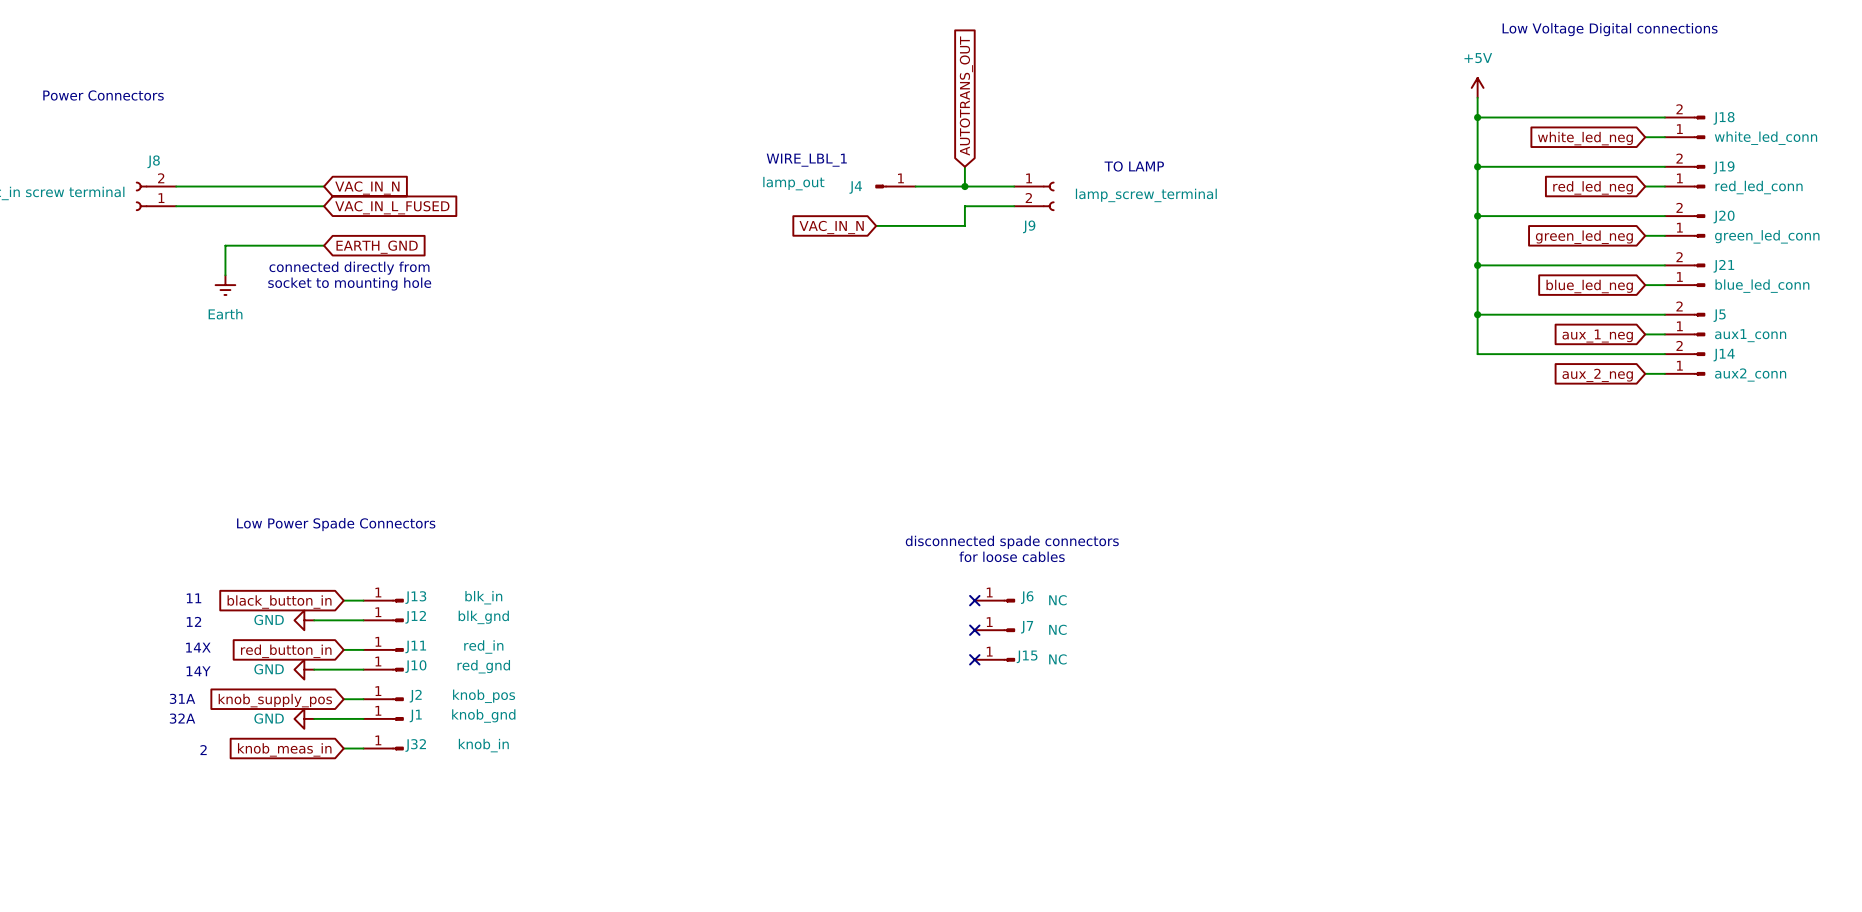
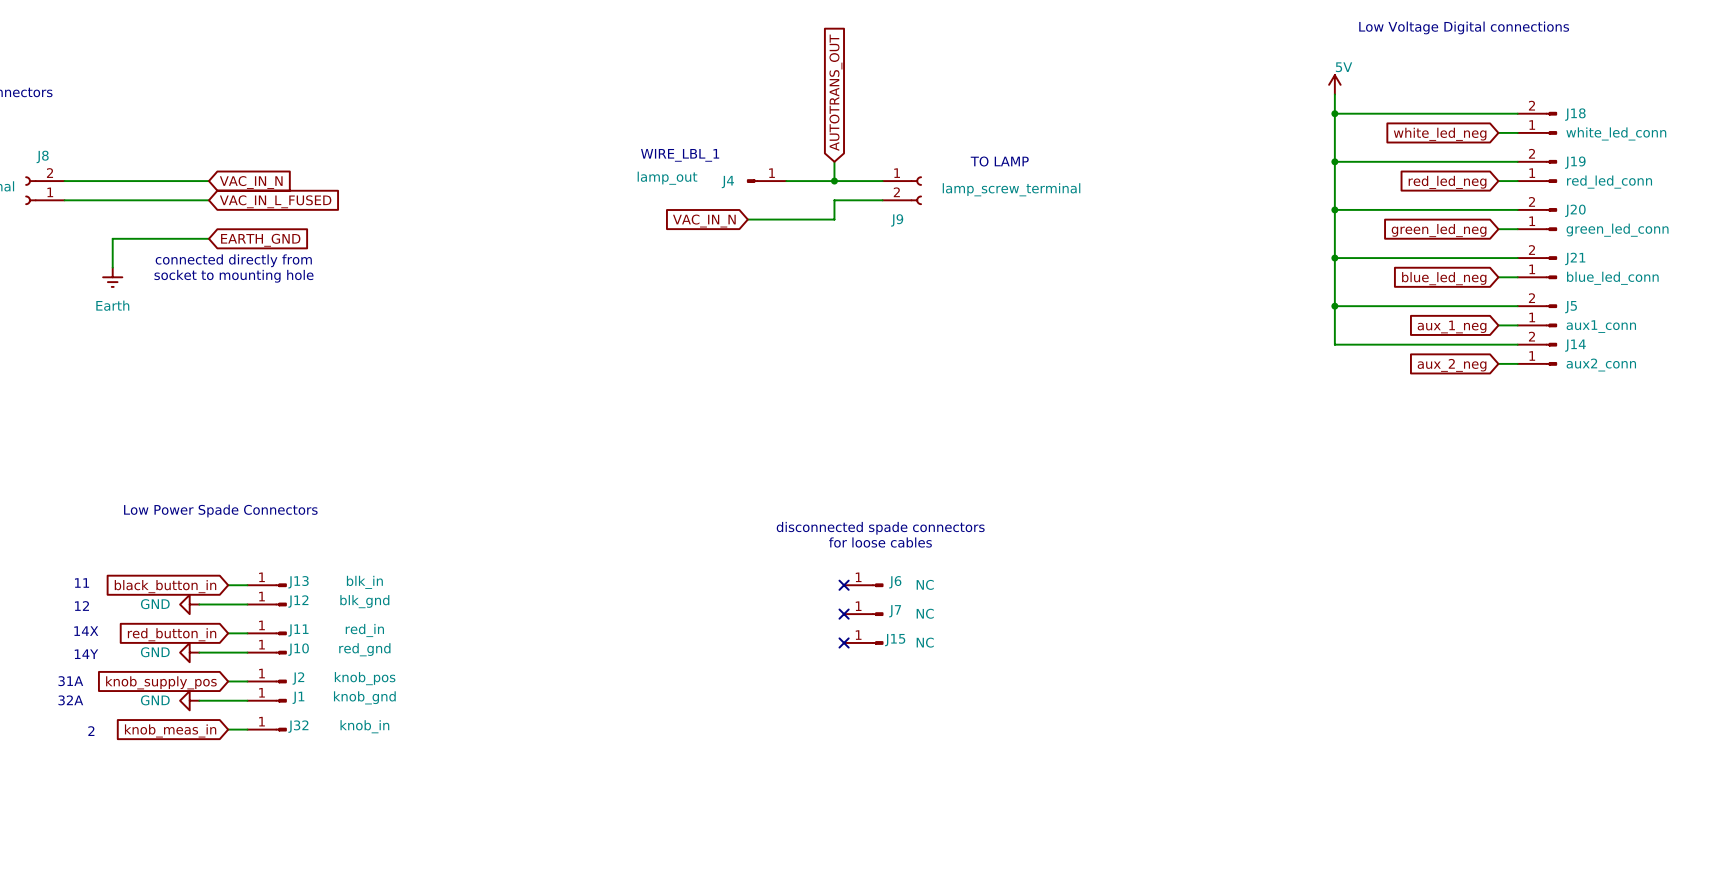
power symbol: +5V (1477, 87) -> 5V (1334, 84)

